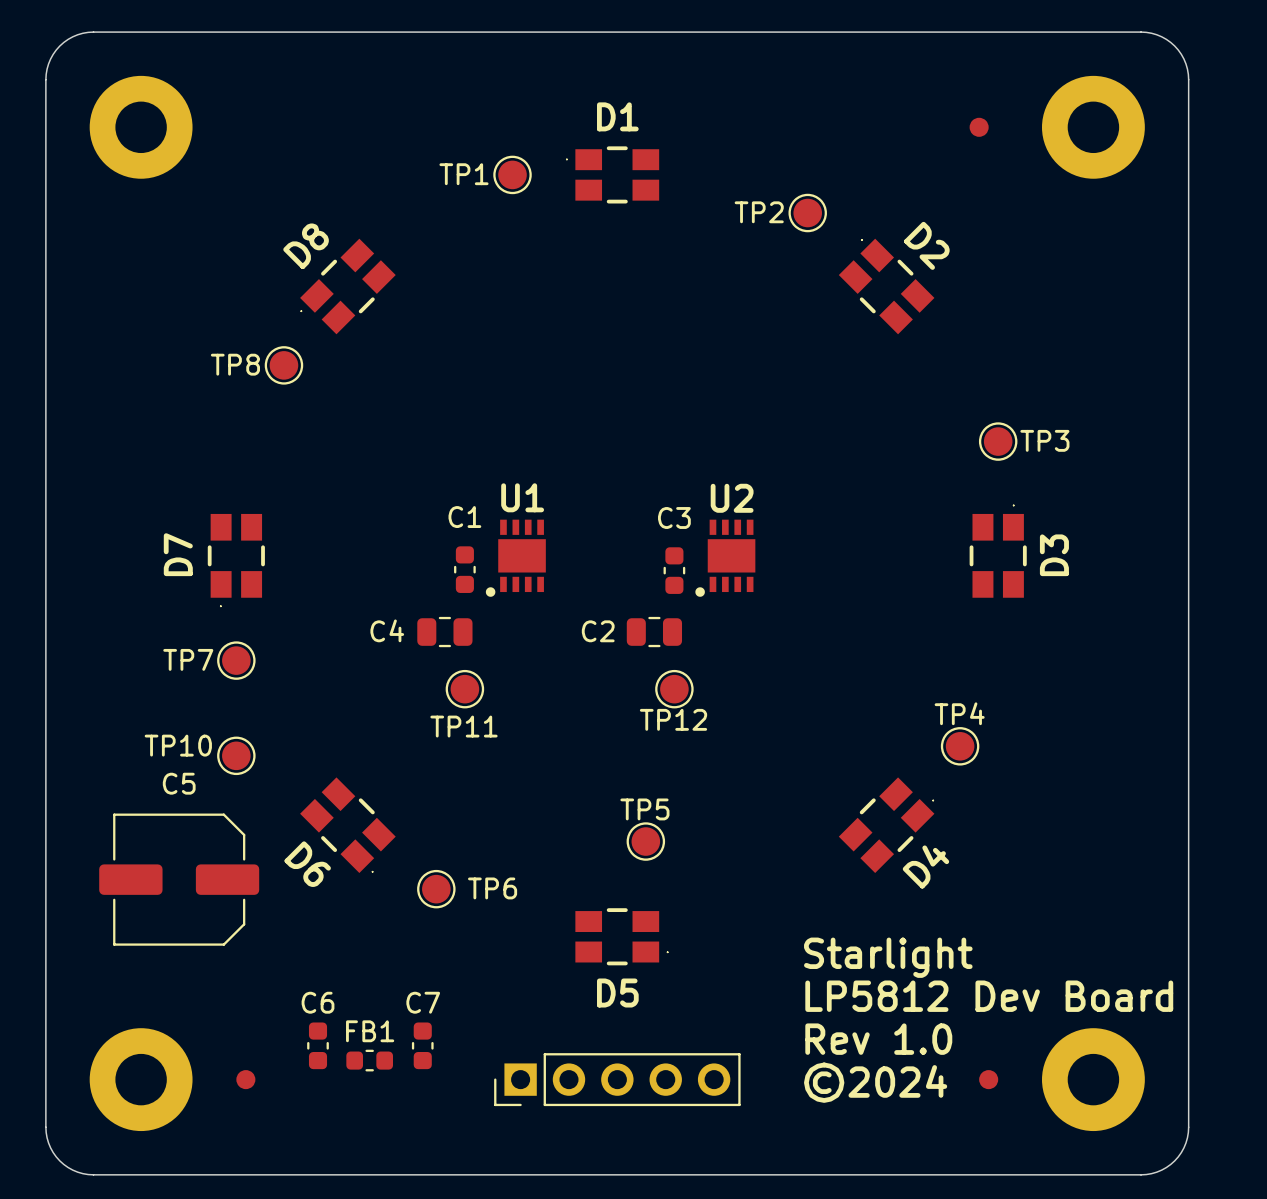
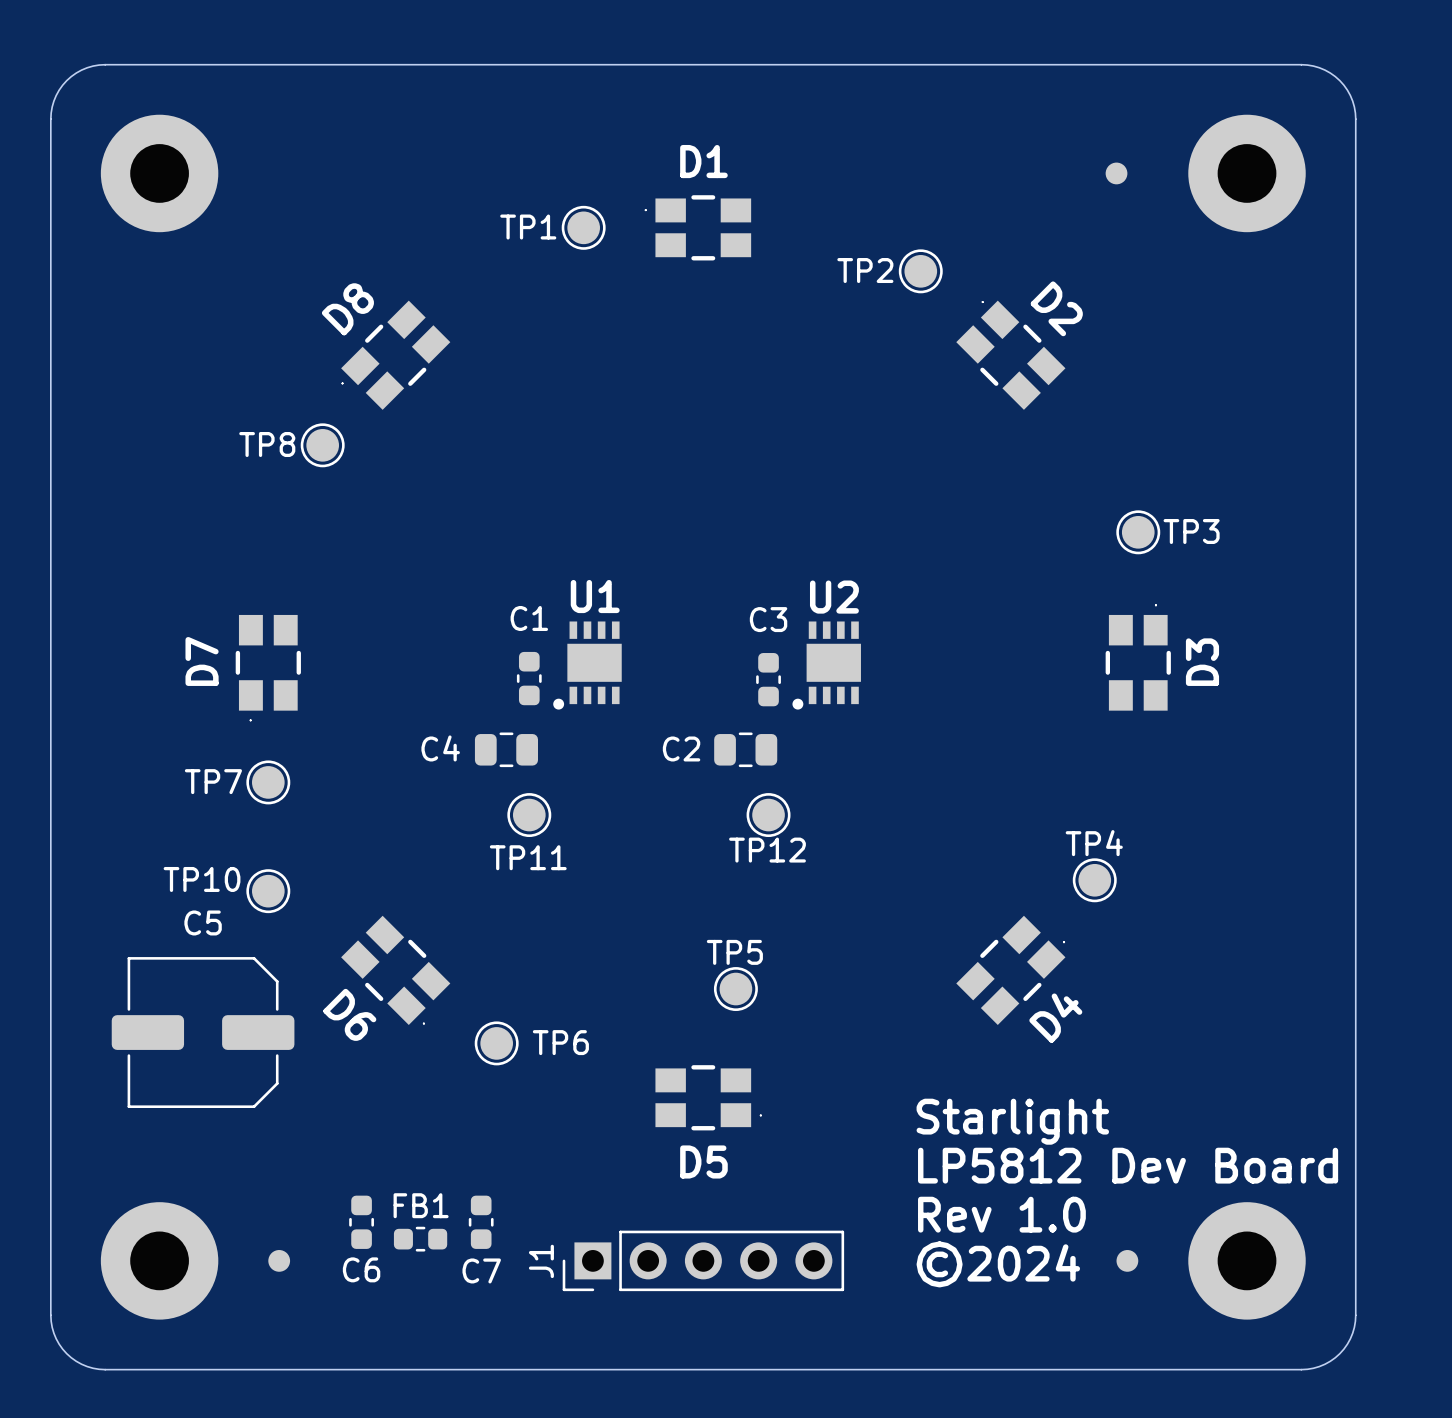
C6 name position: C6 (318, 1002) -> C6 (361, 1269)
C7 name position: C7 (423, 1002) -> C7 (481, 1270)
J1 name: none -> J1 (541, 1261)

